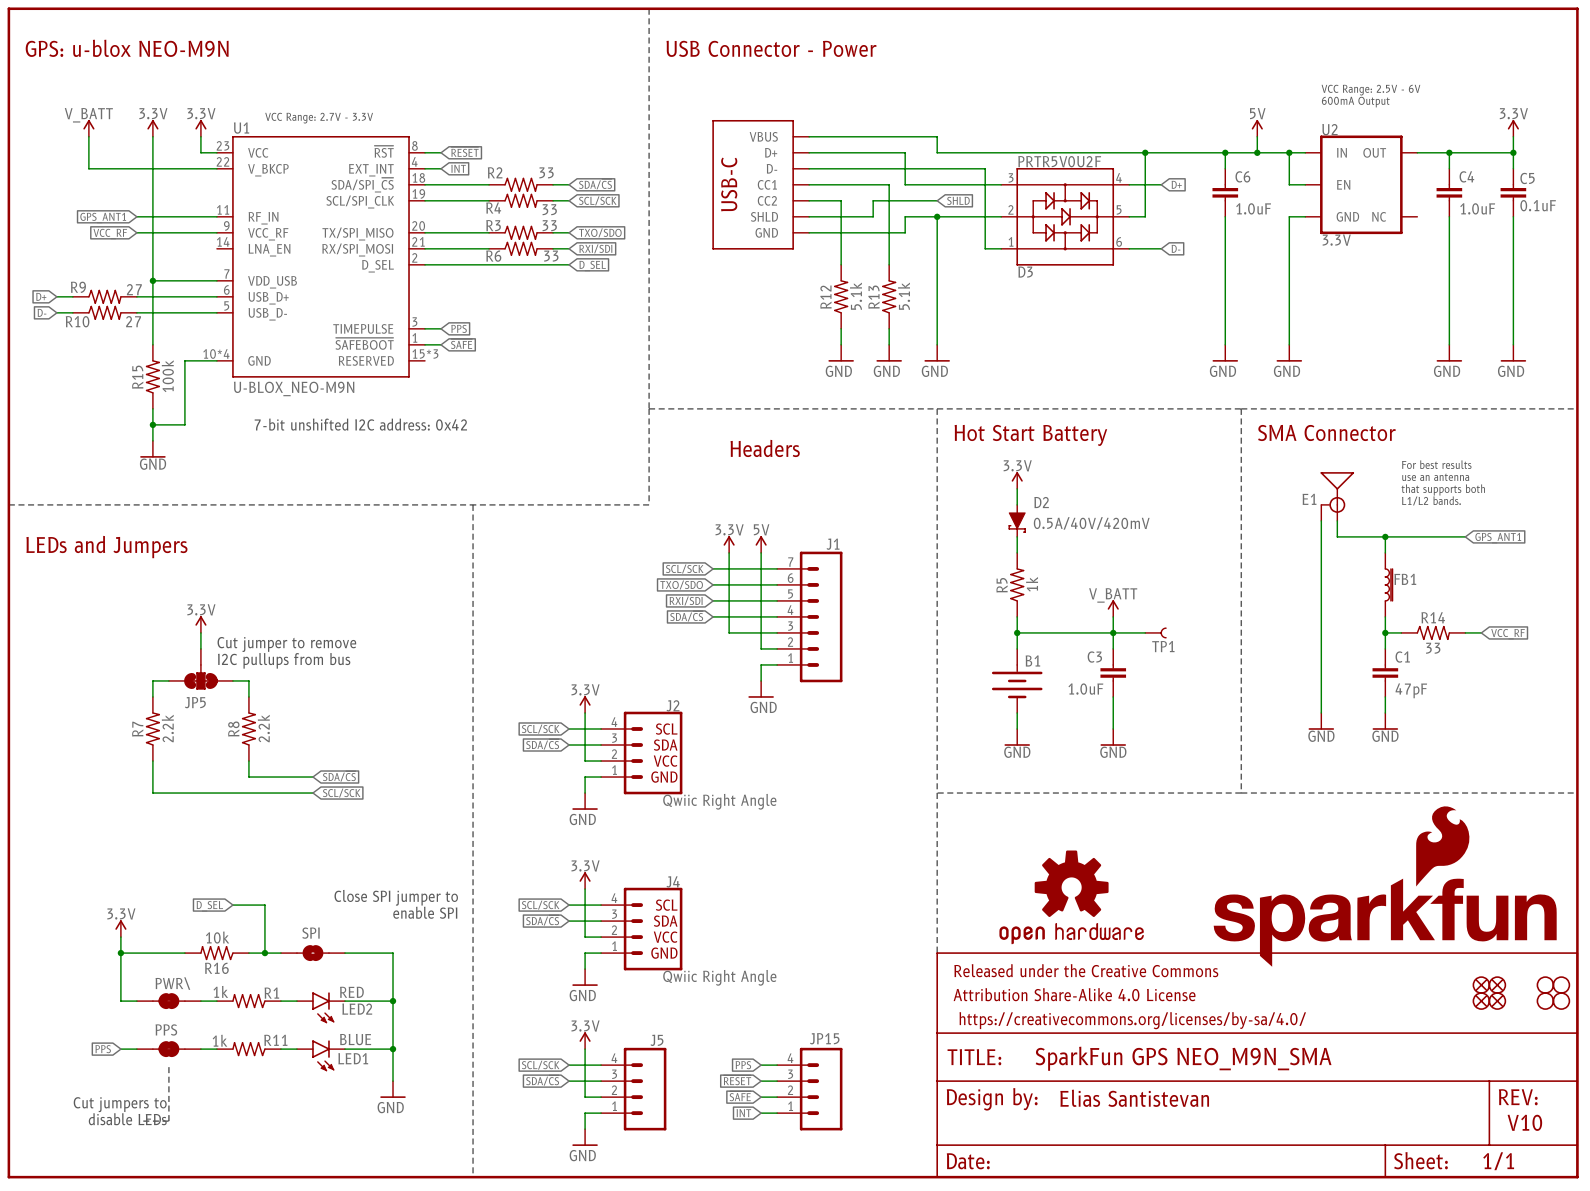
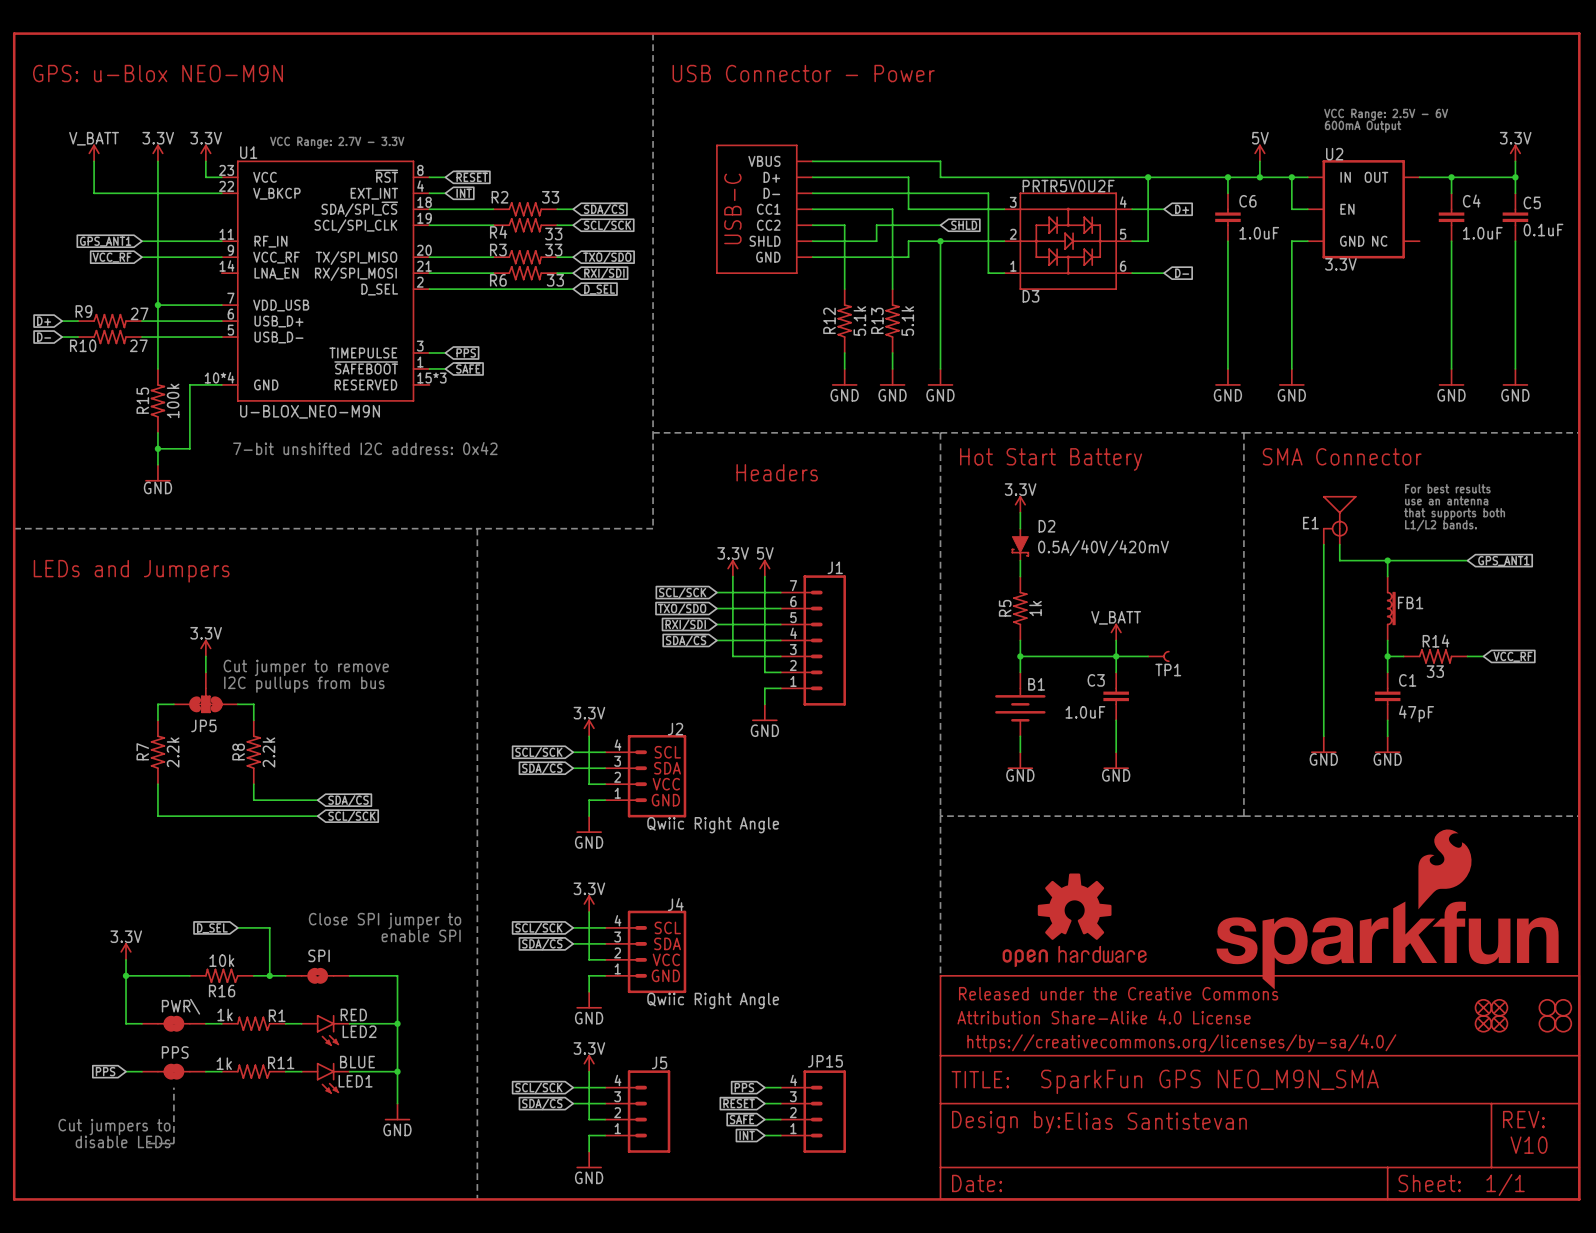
text: GPS: u-blox NEO-M9N (127, 48) -> GPS: u-Blox NEO-M9N (158, 73)

